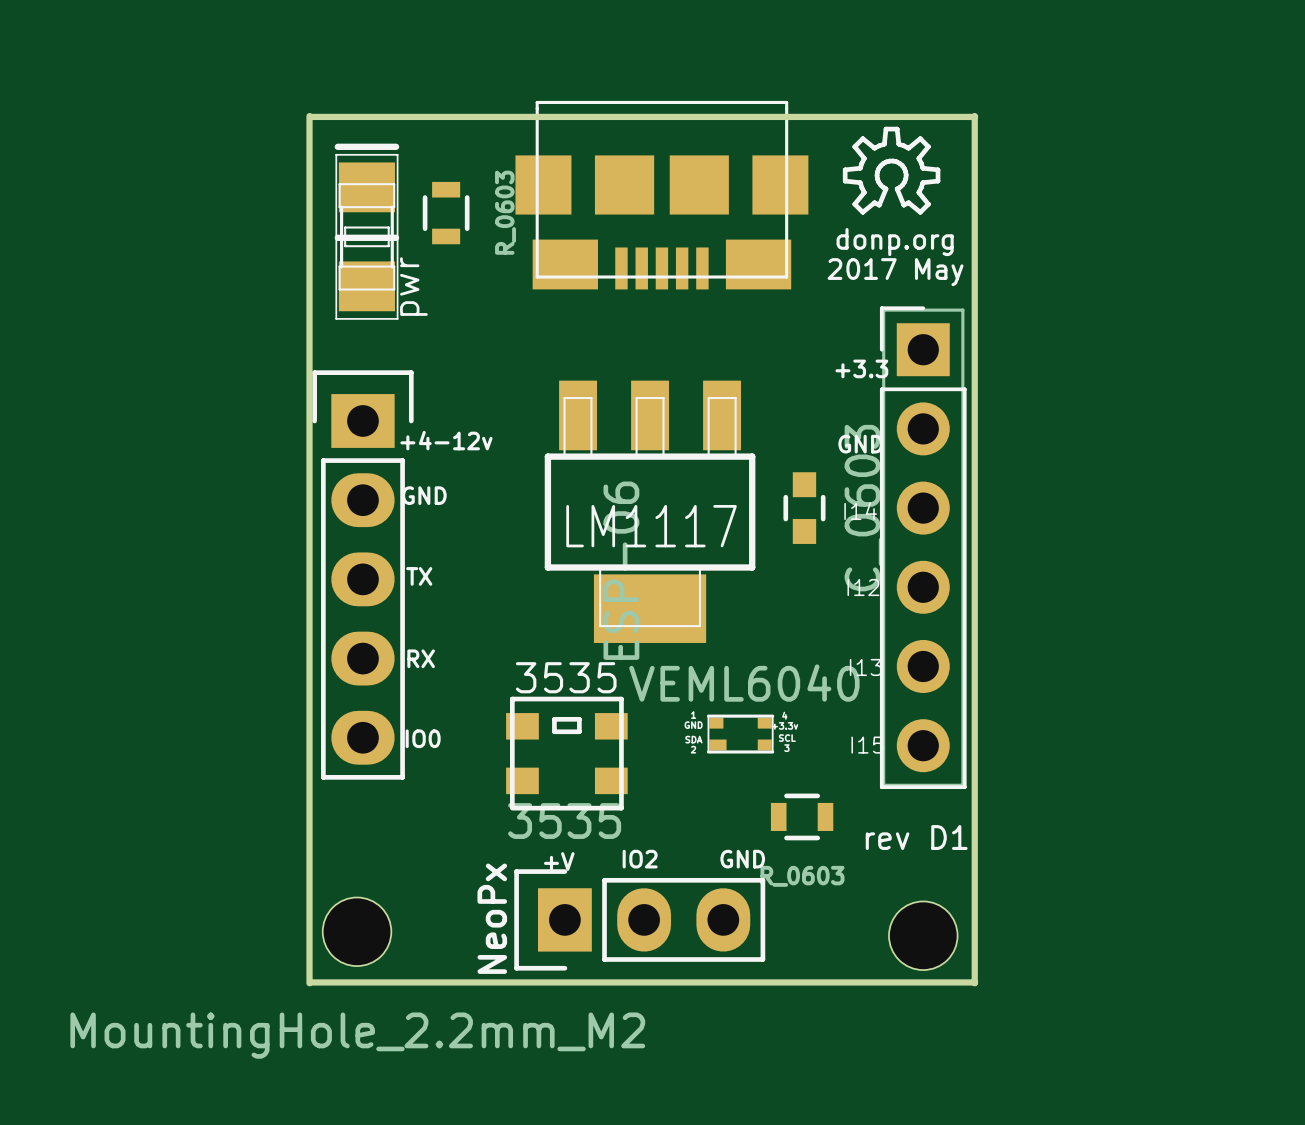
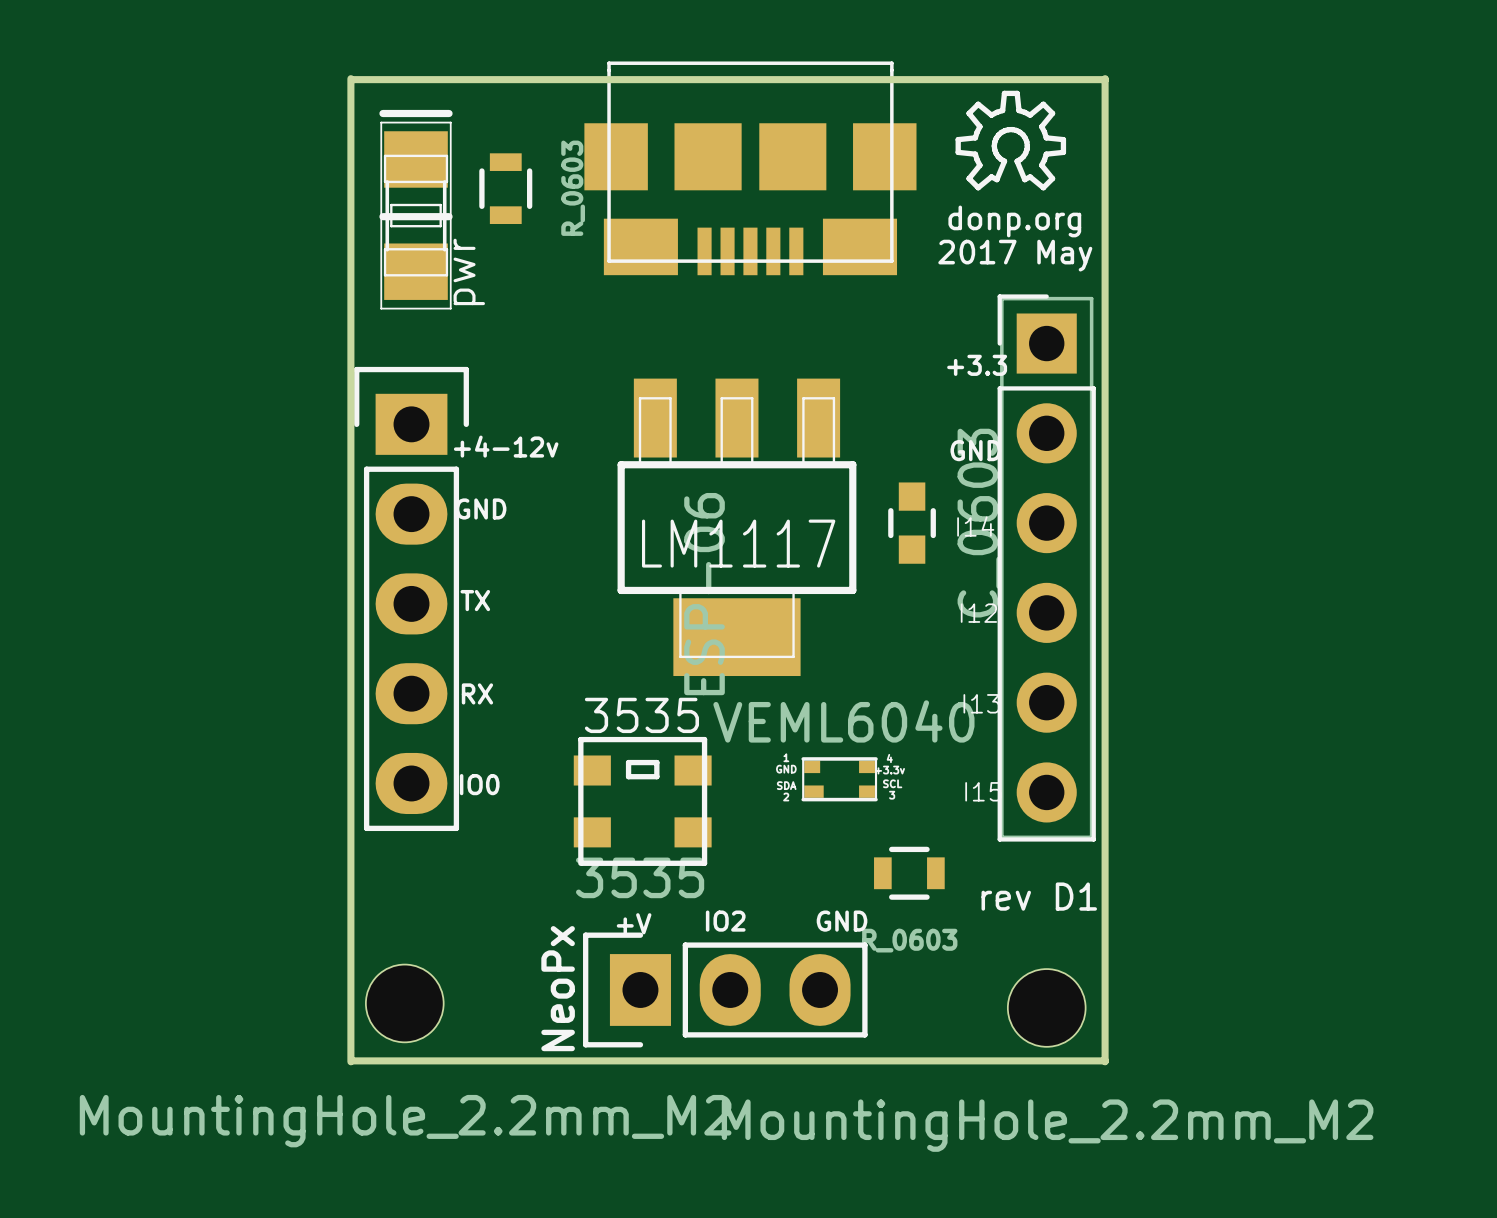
part value: none -> MountingHole_2.2mm_M2 (1047, 1125)

